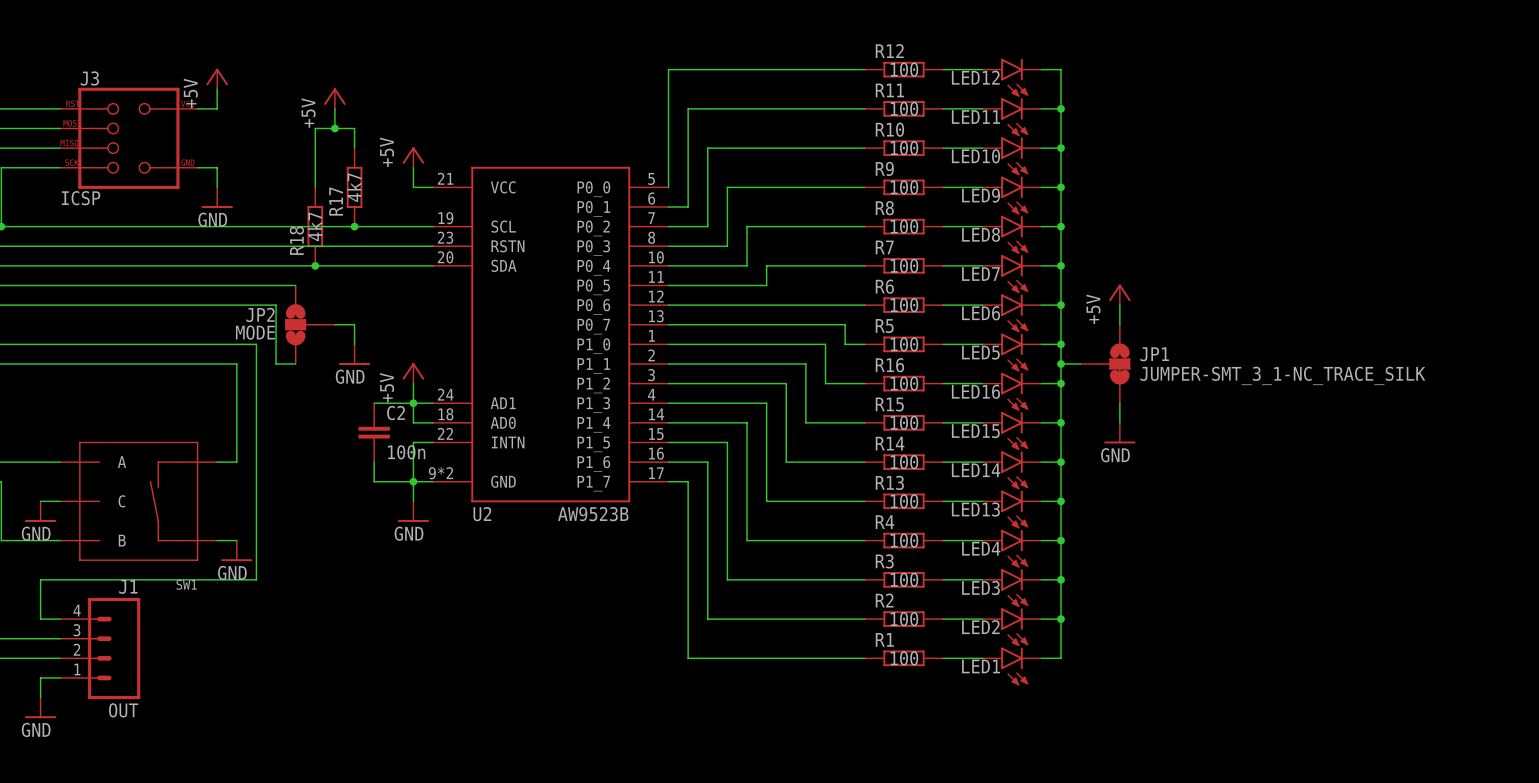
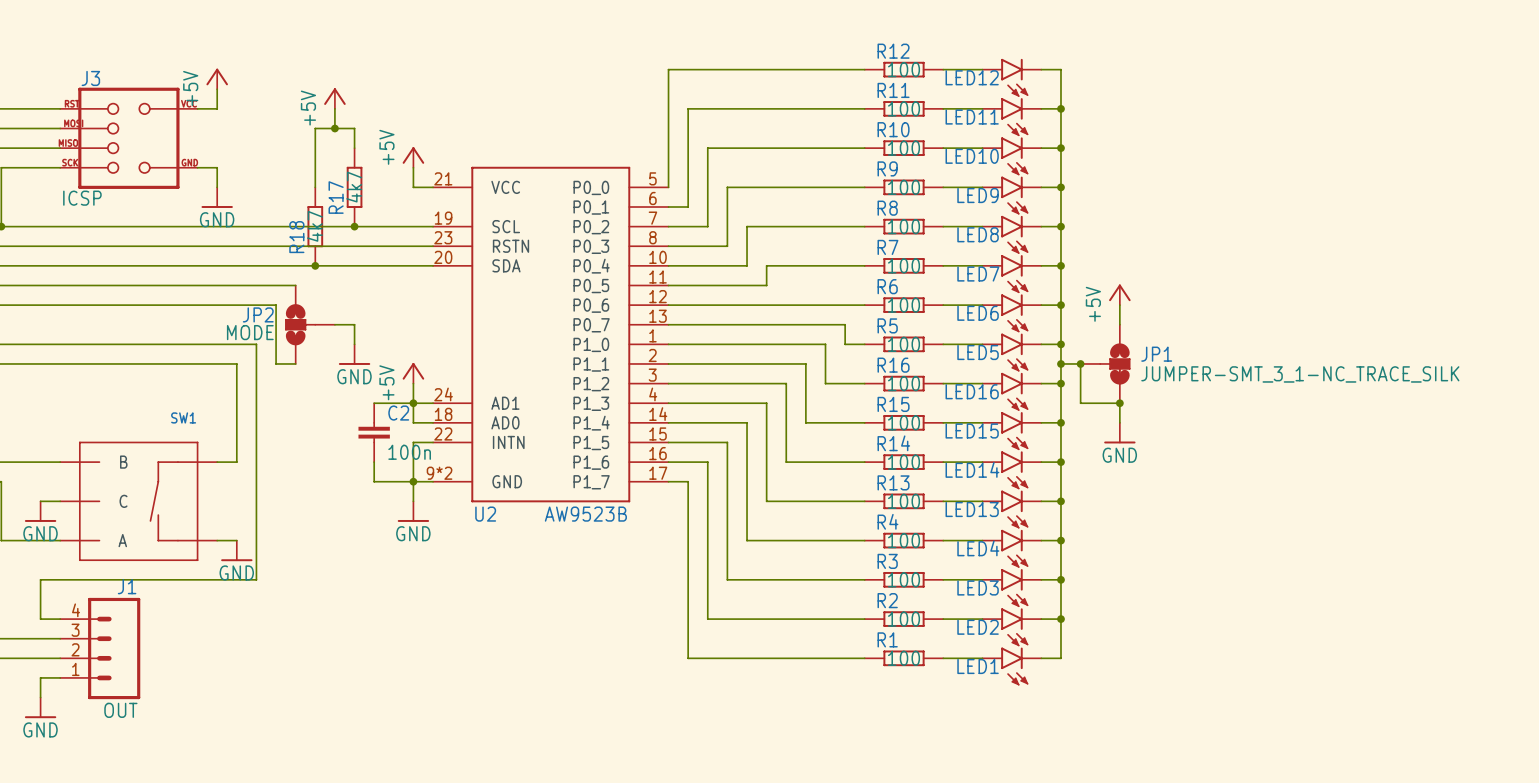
wire: none -> (1080, 363) (1080, 403) (1119, 403)
junction: none -> (1080, 363)
junction: none -> (1119, 403)
SW1 flip: as is (138, 501) -> up-down (138, 501)

